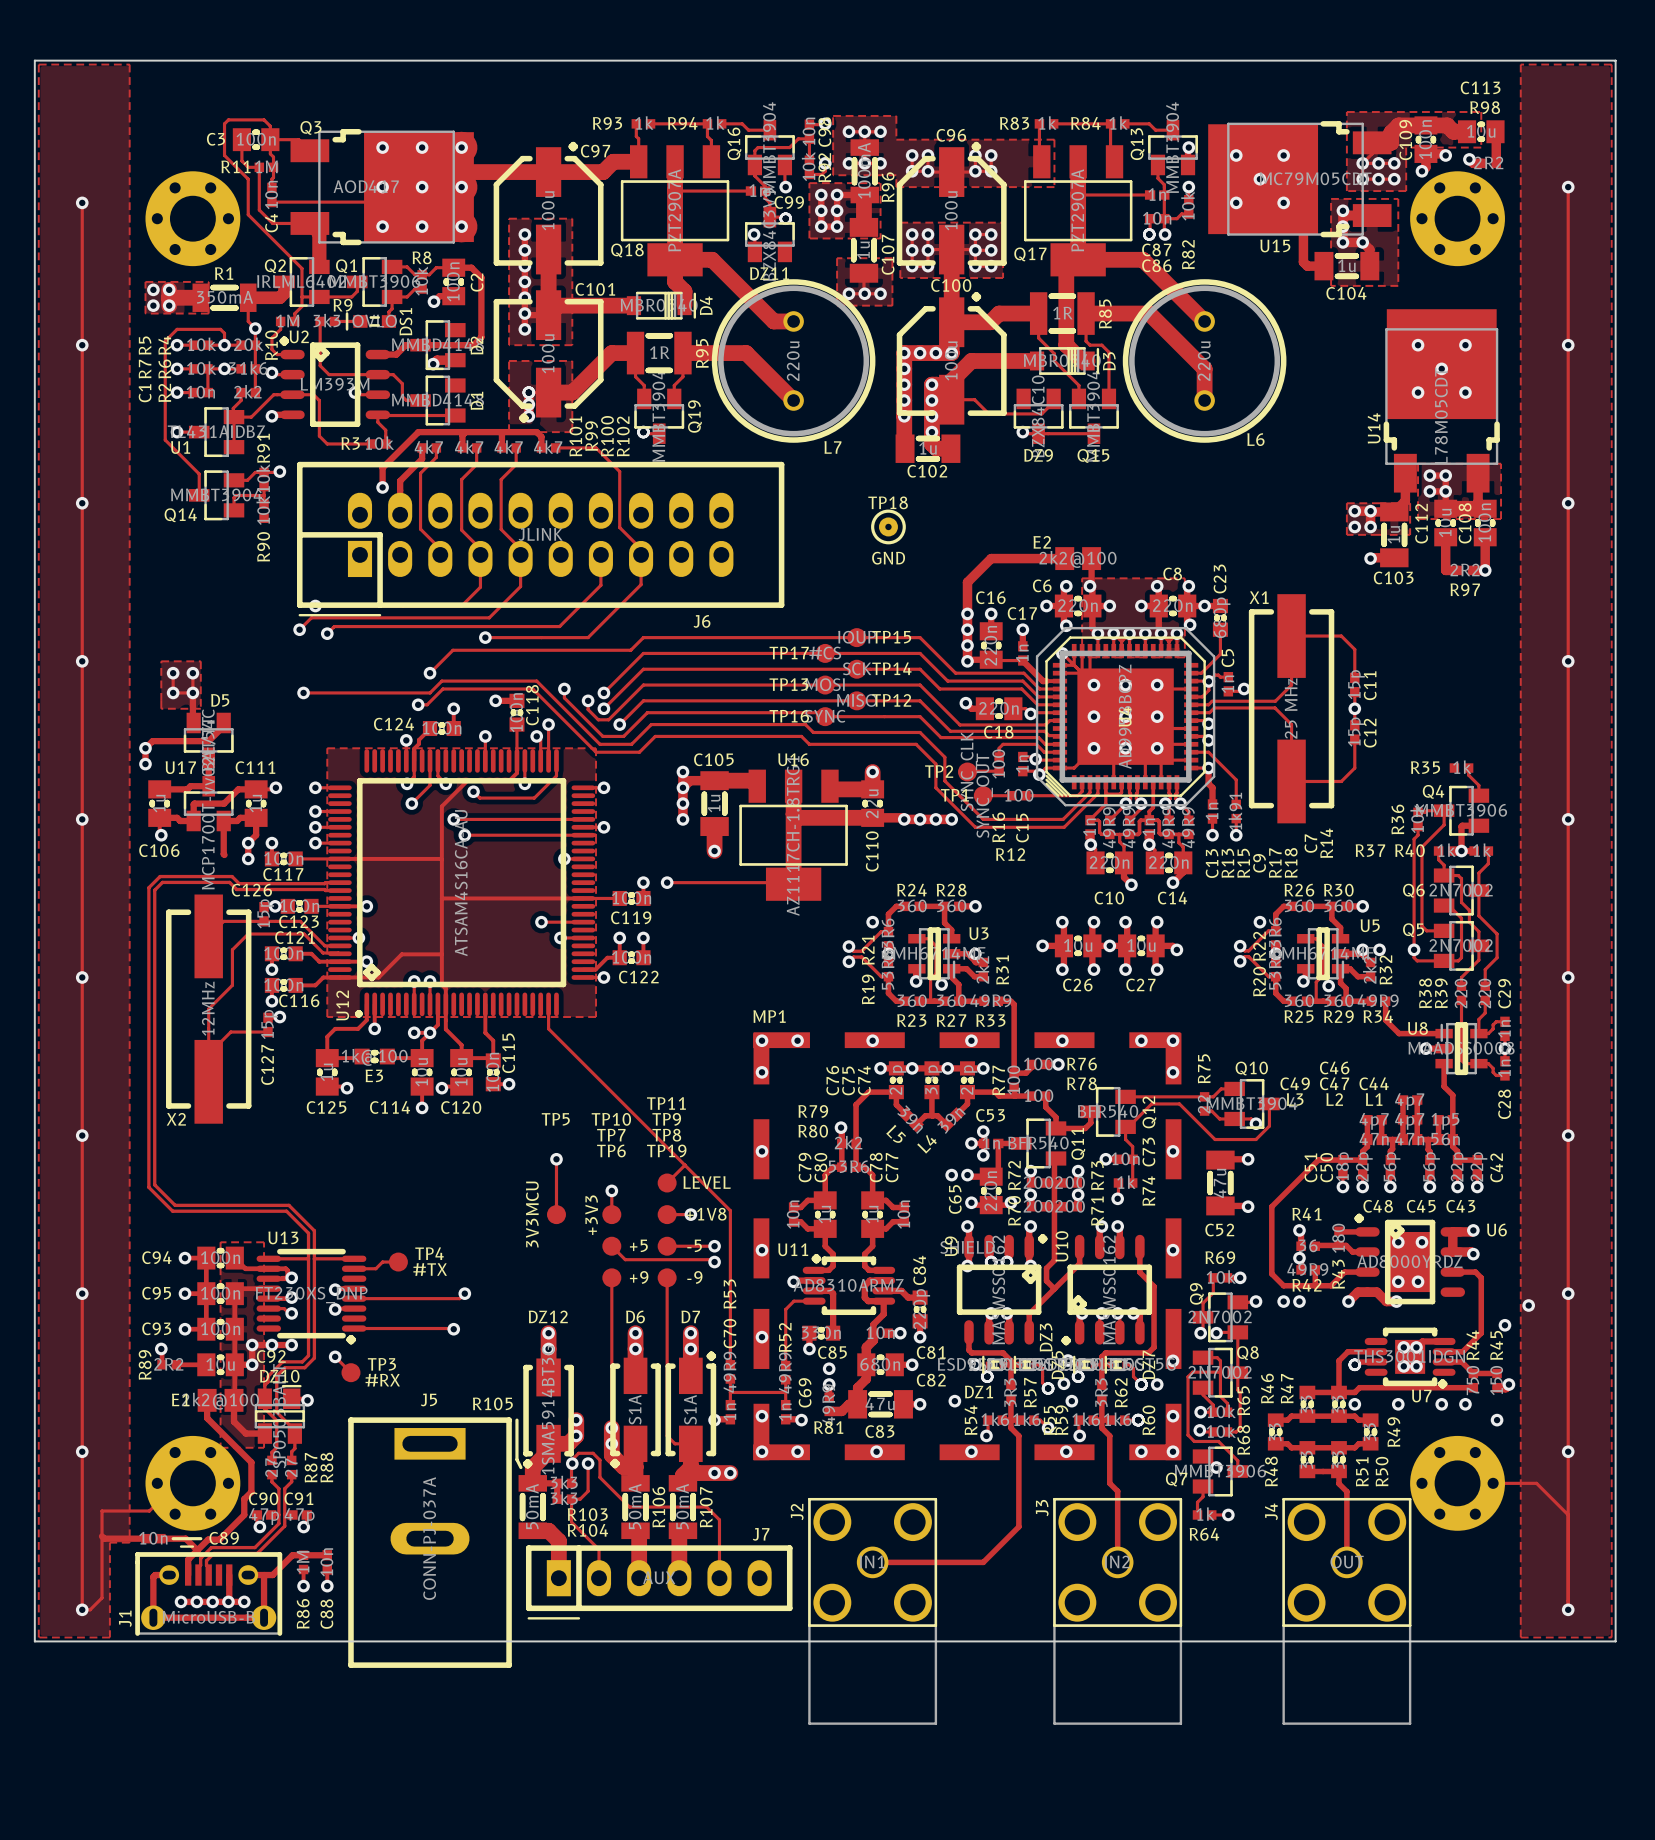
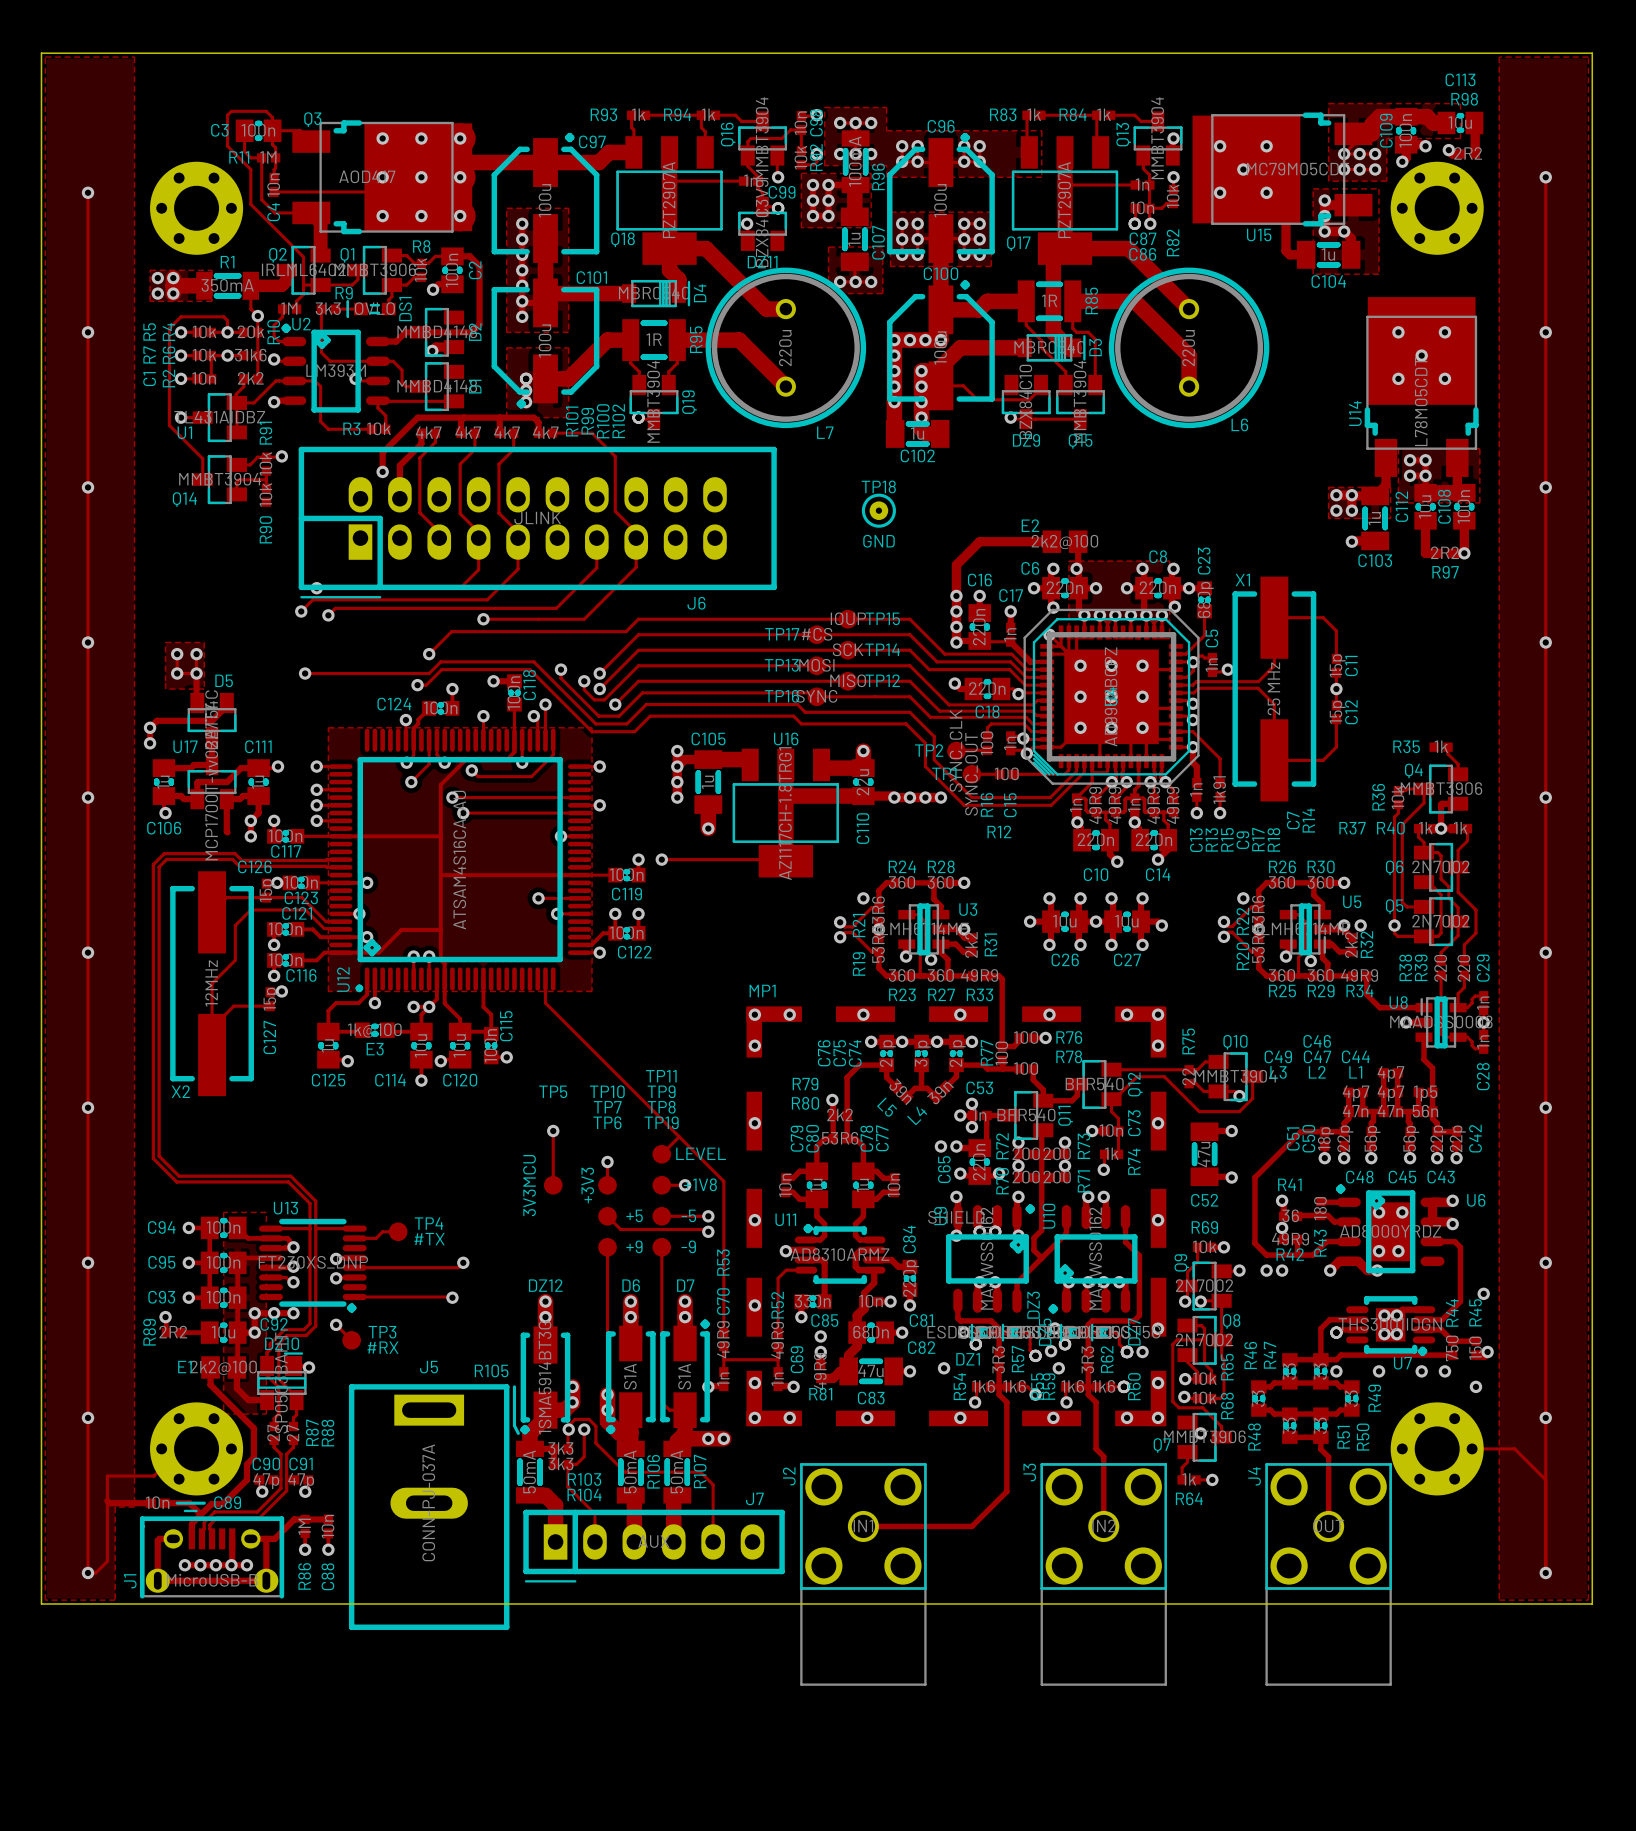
via: (1528, 1305) -> none

